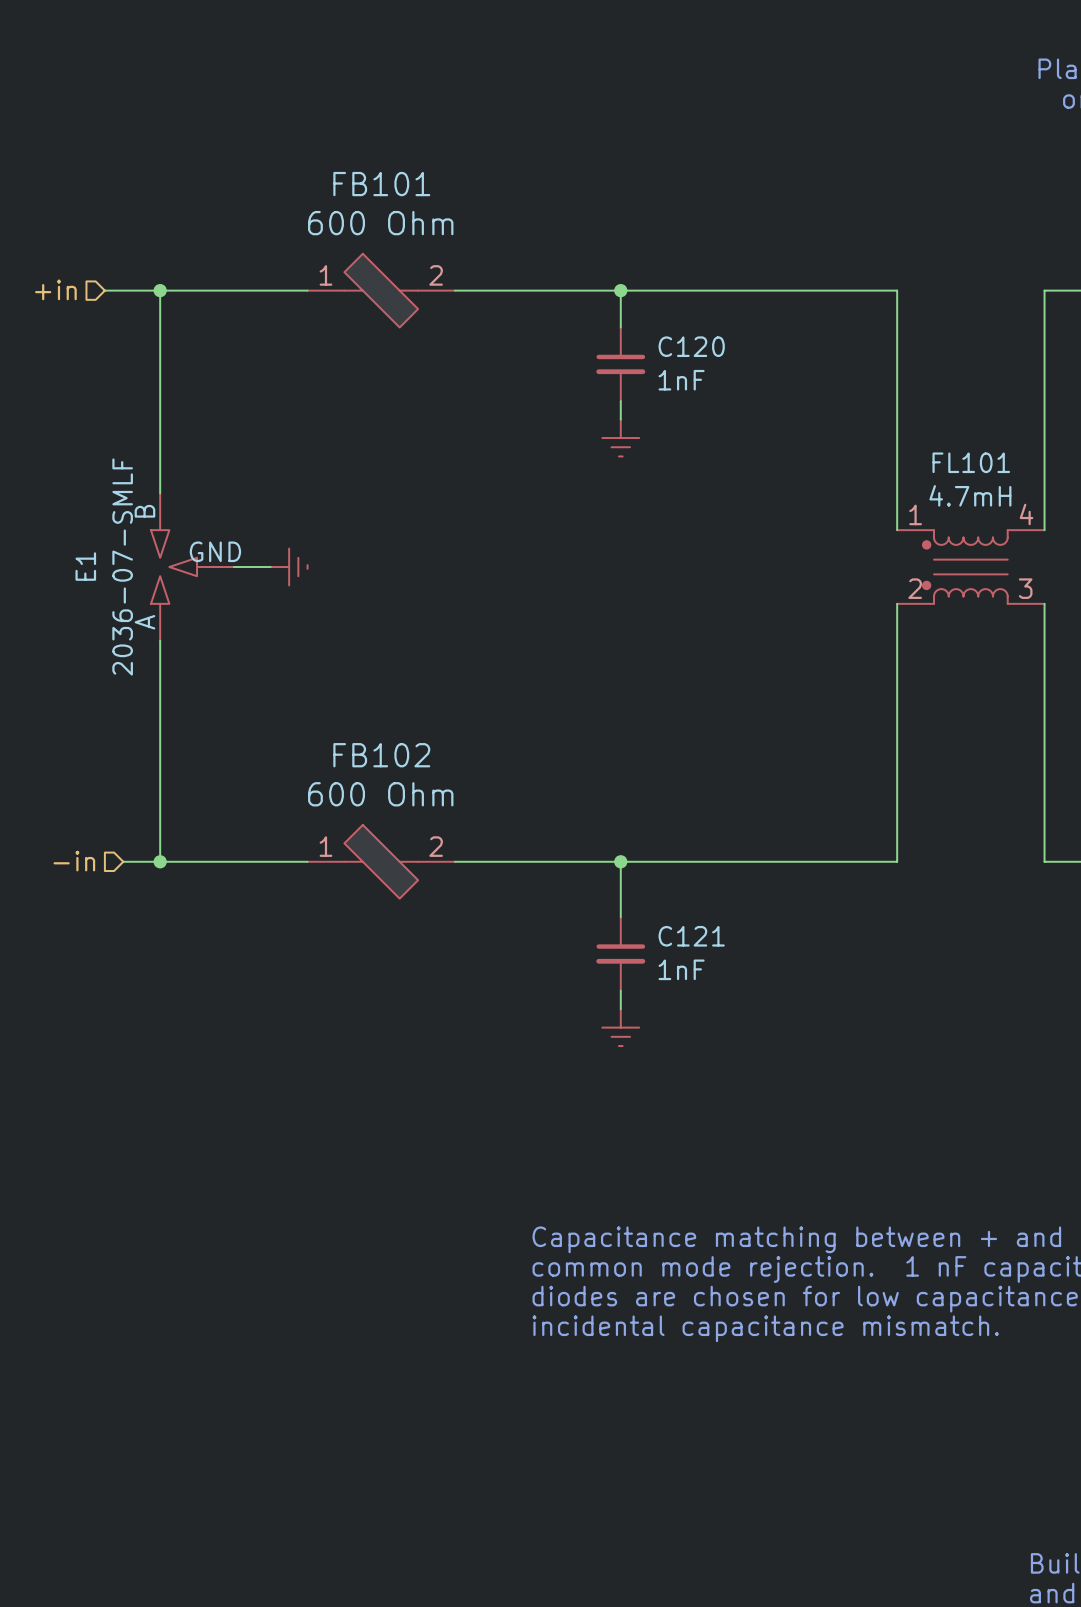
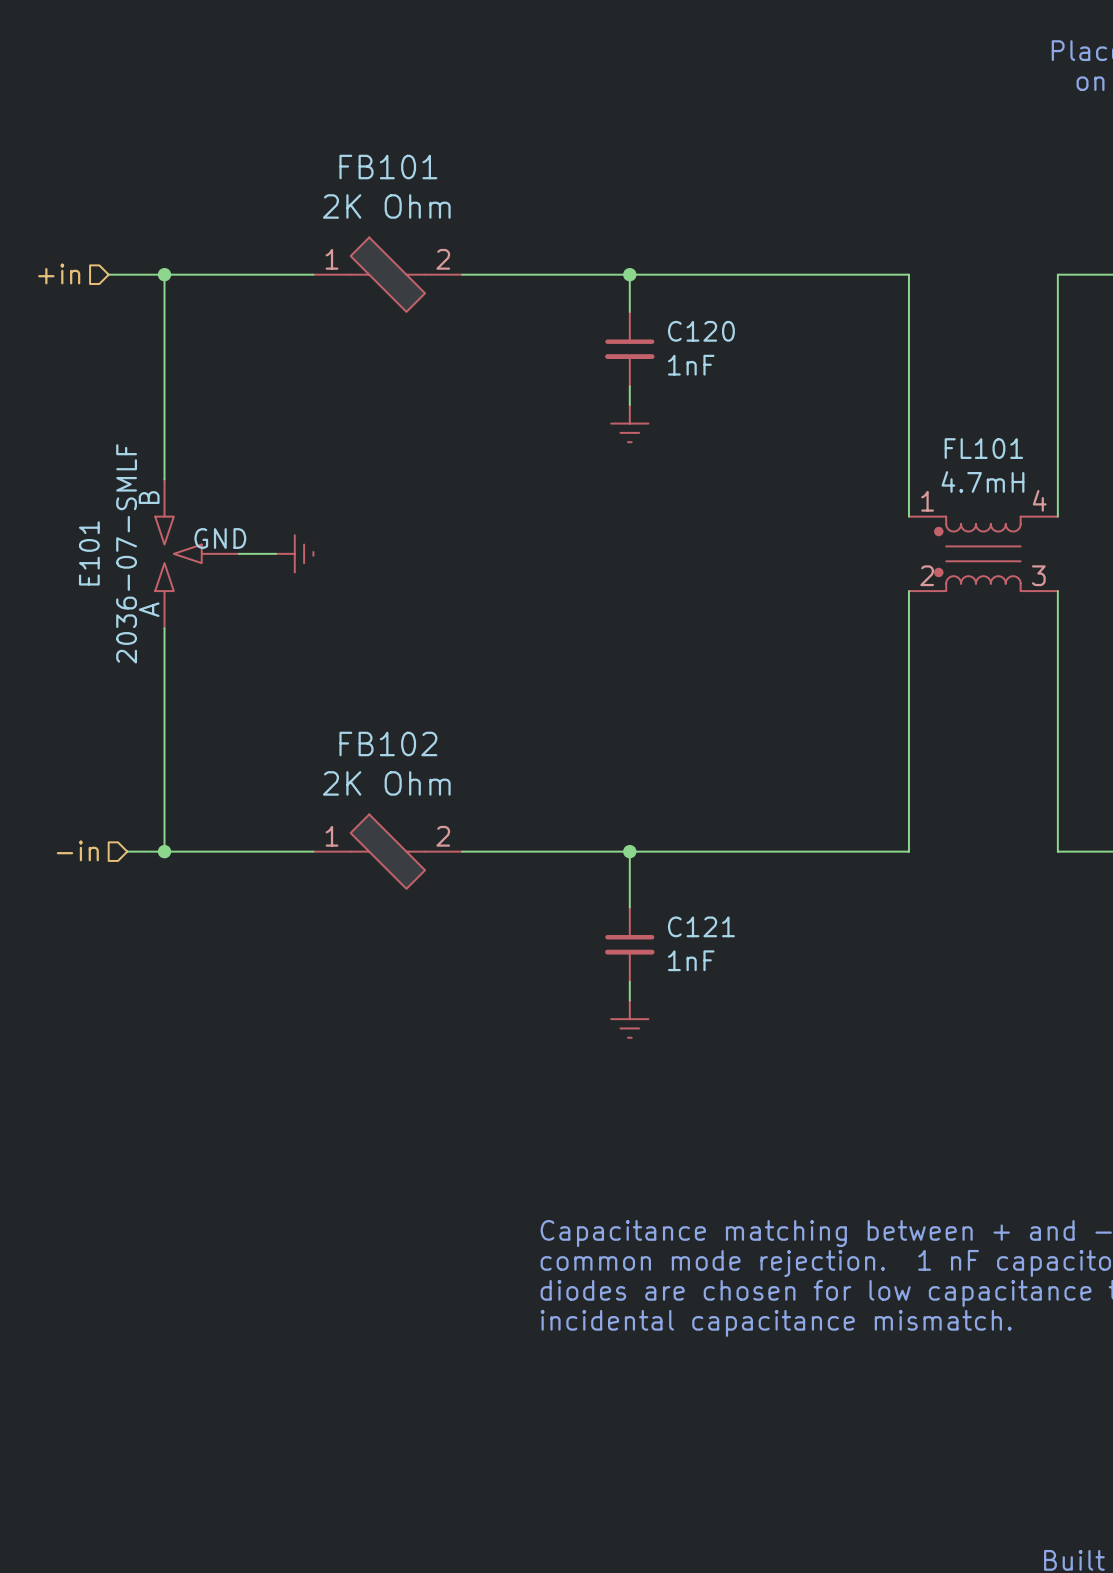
FB101 value: 600 Ohm (380, 223) -> 2K Ohm (386, 206)
E1 name: E1 (85, 566) -> E101 (89, 553)
FB102 value: 600 Ohm (380, 794) -> 2K Ohm (386, 783)

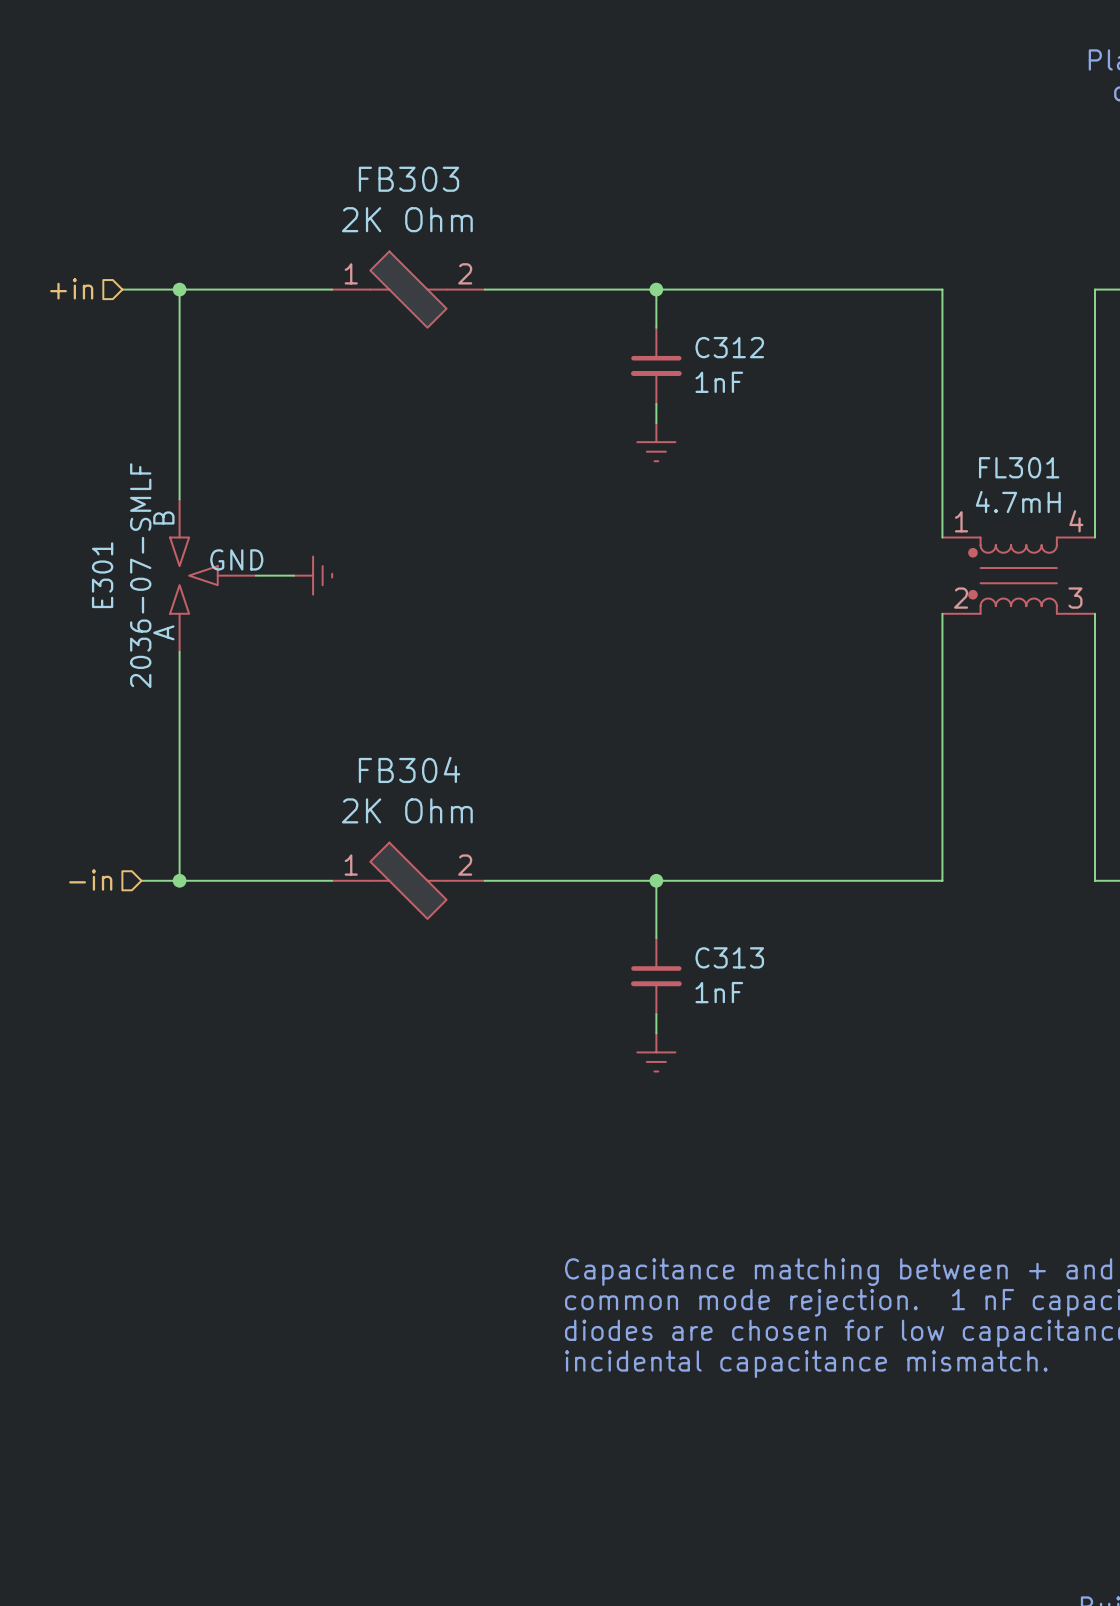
FB101 name: FB101 (388, 167) -> FB303 (408, 179)
C120 name: C120 (701, 331) -> C312 (729, 347)
FL101 name: FL101 (983, 448) -> FL301 (1019, 467)
E101 name: E101 (89, 553) -> E301 (102, 575)
FB102 name: FB102 (388, 743) -> FB304 (409, 769)
C121 name: C121 (701, 926) -> C313 (729, 957)

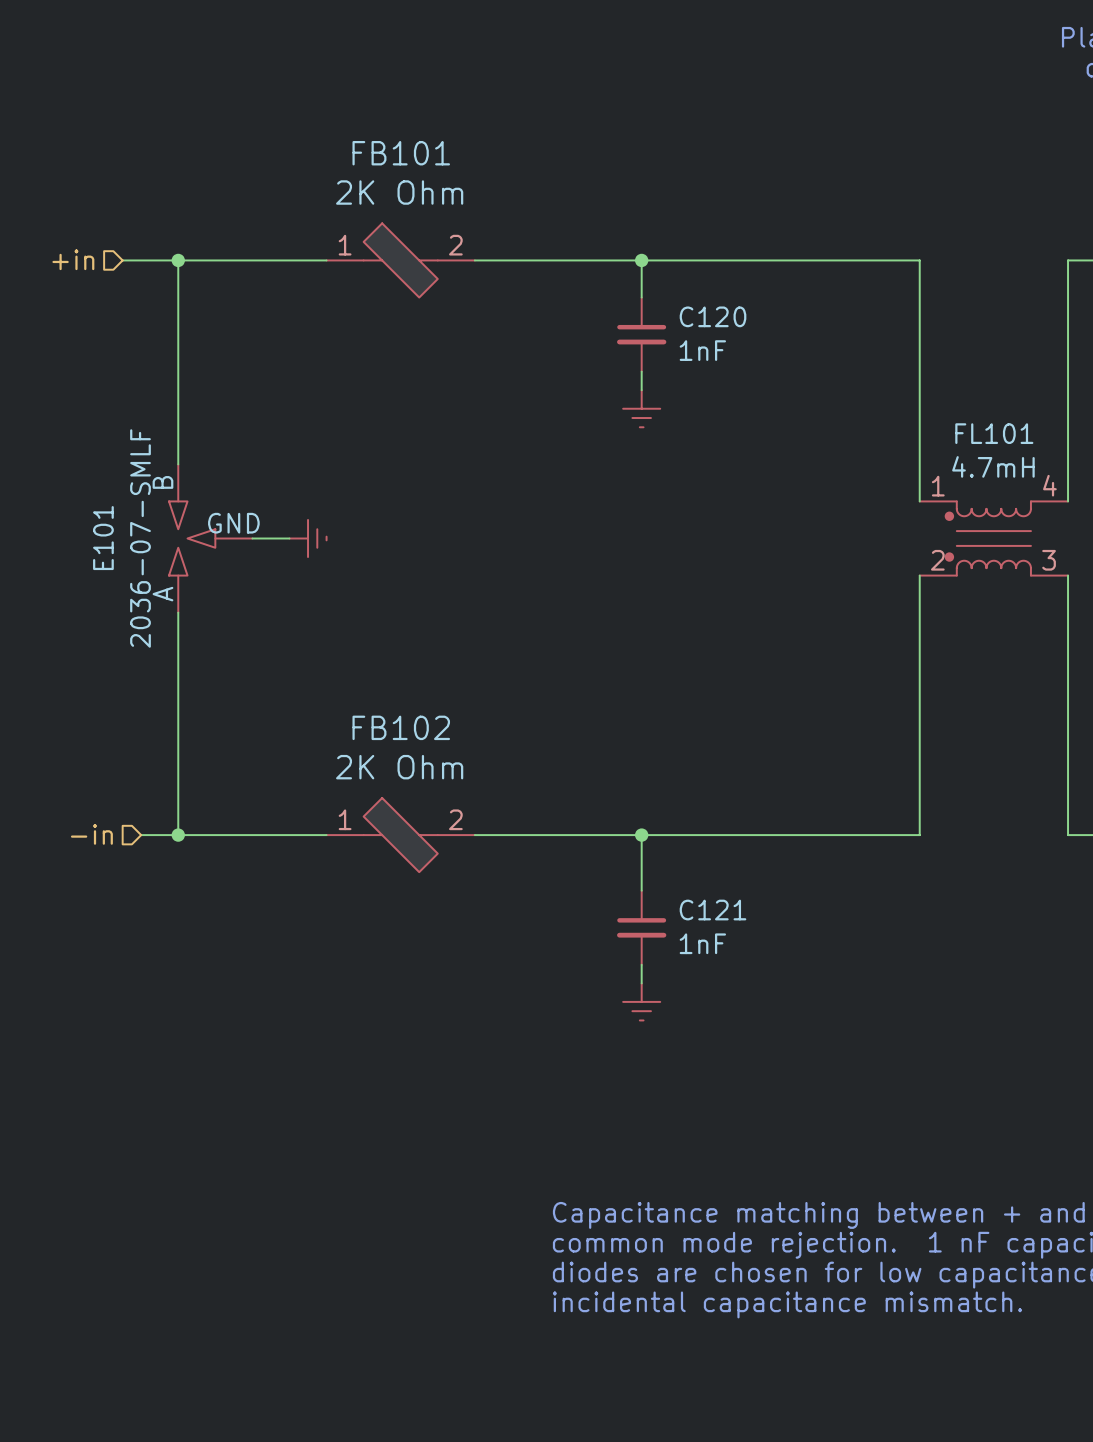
FB303 name: FB303 (408, 179) -> FB101 (401, 153)
C312 name: C312 (729, 347) -> C120 (713, 316)
FL301 name: FL301 (1019, 467) -> FL101 (994, 433)
E301 name: E301 (102, 575) -> E101 (103, 538)
FB304 name: FB304 (409, 769) -> FB102 (401, 727)
C313 name: C313 (729, 957) -> C121 (713, 910)

